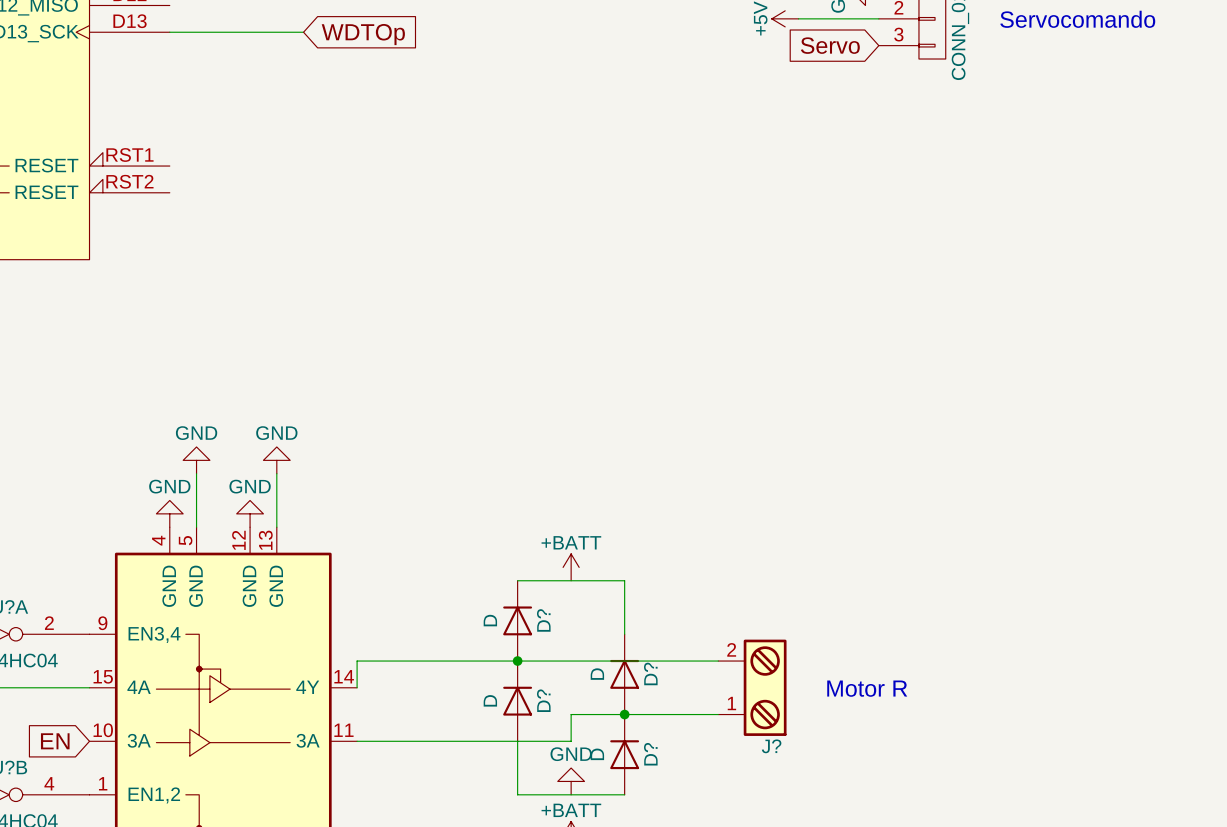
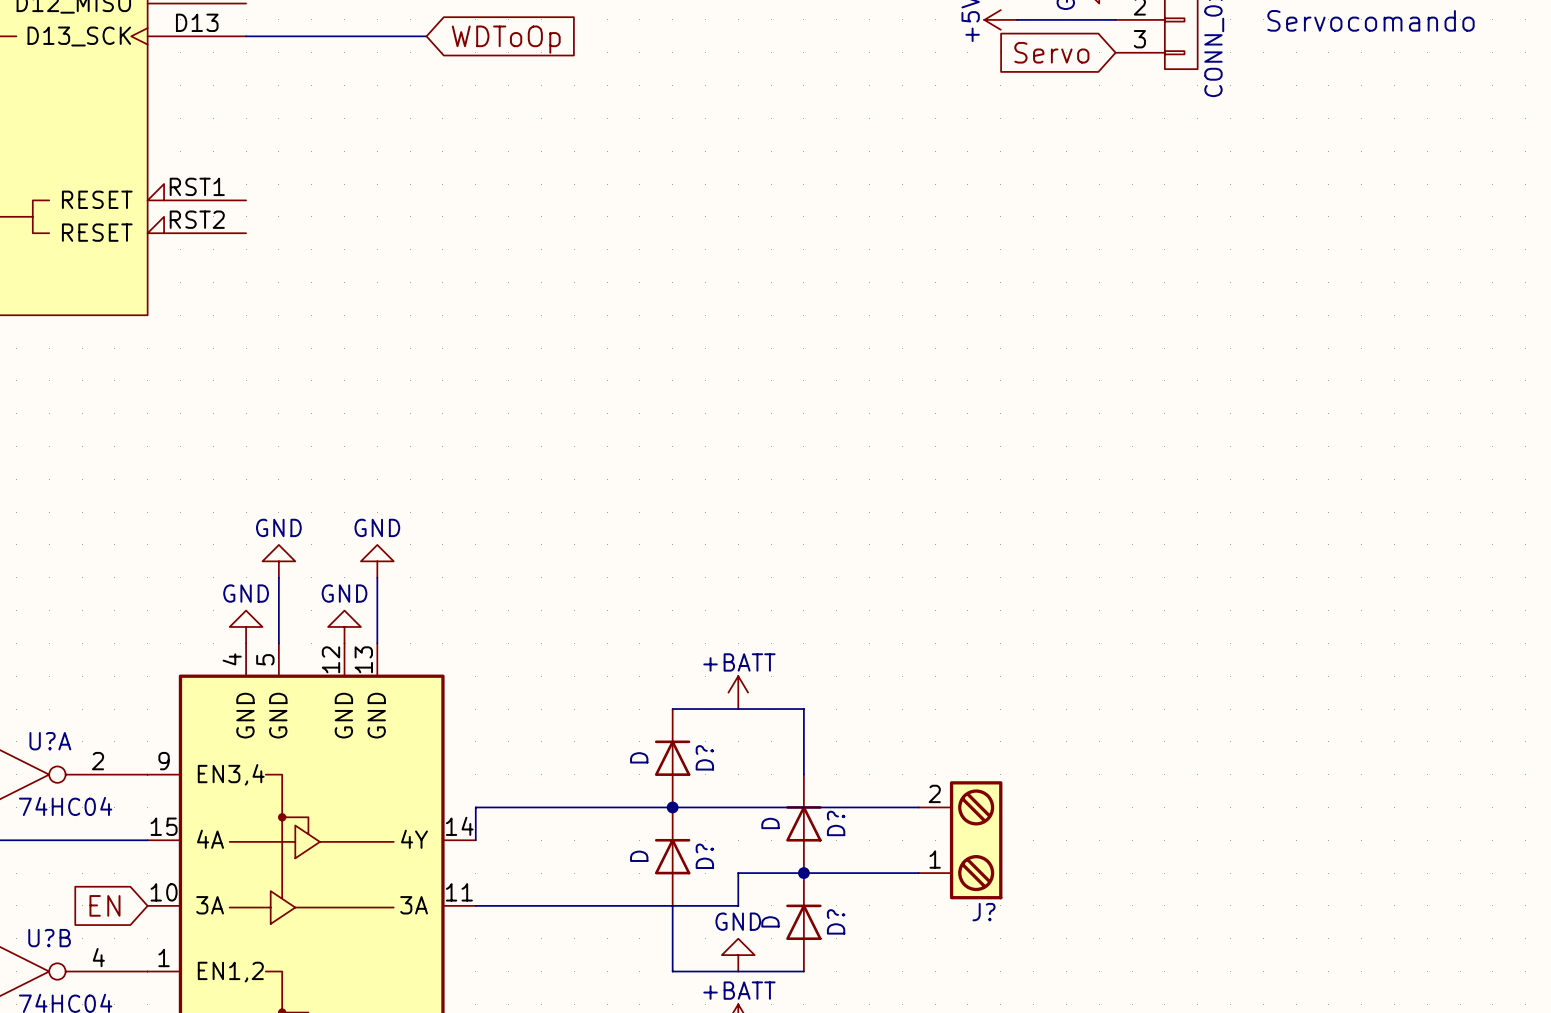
wire: none -> (410, 36) (426, 36)
global label: WDTOp (363, 34) -> WDToOp (506, 39)
text: Motor R (867, 688) -> none

